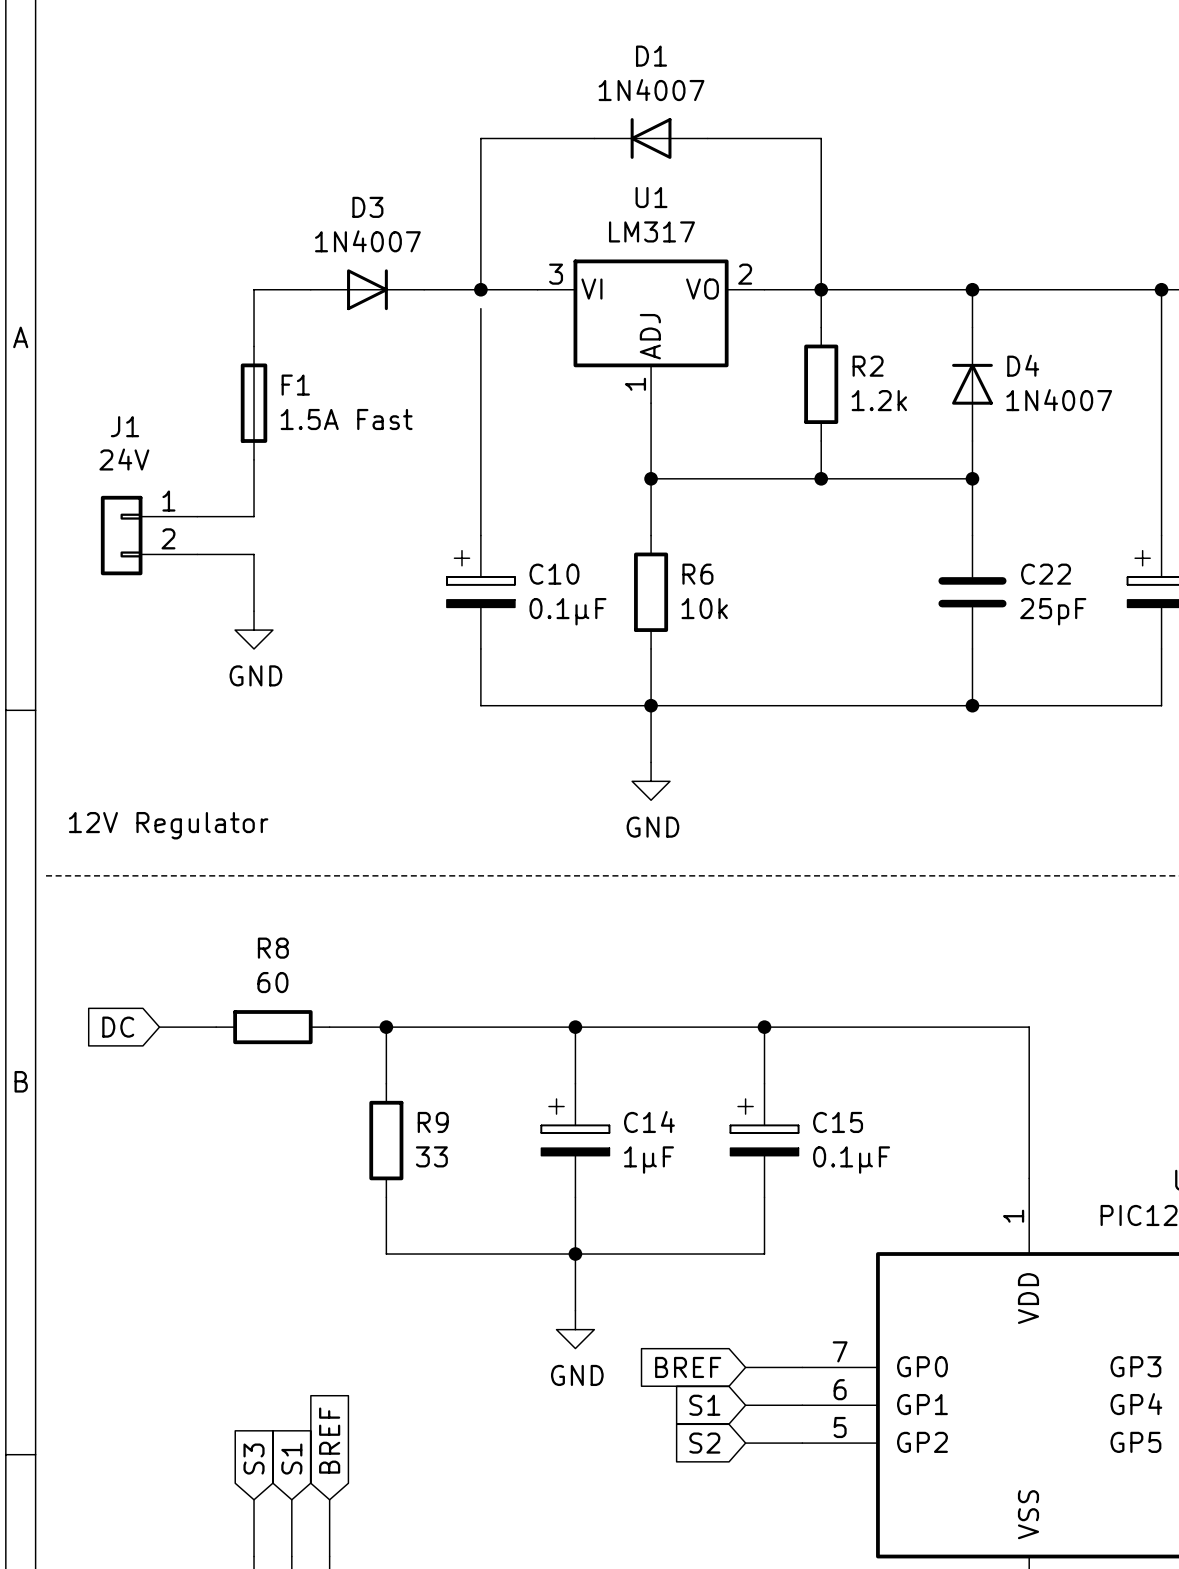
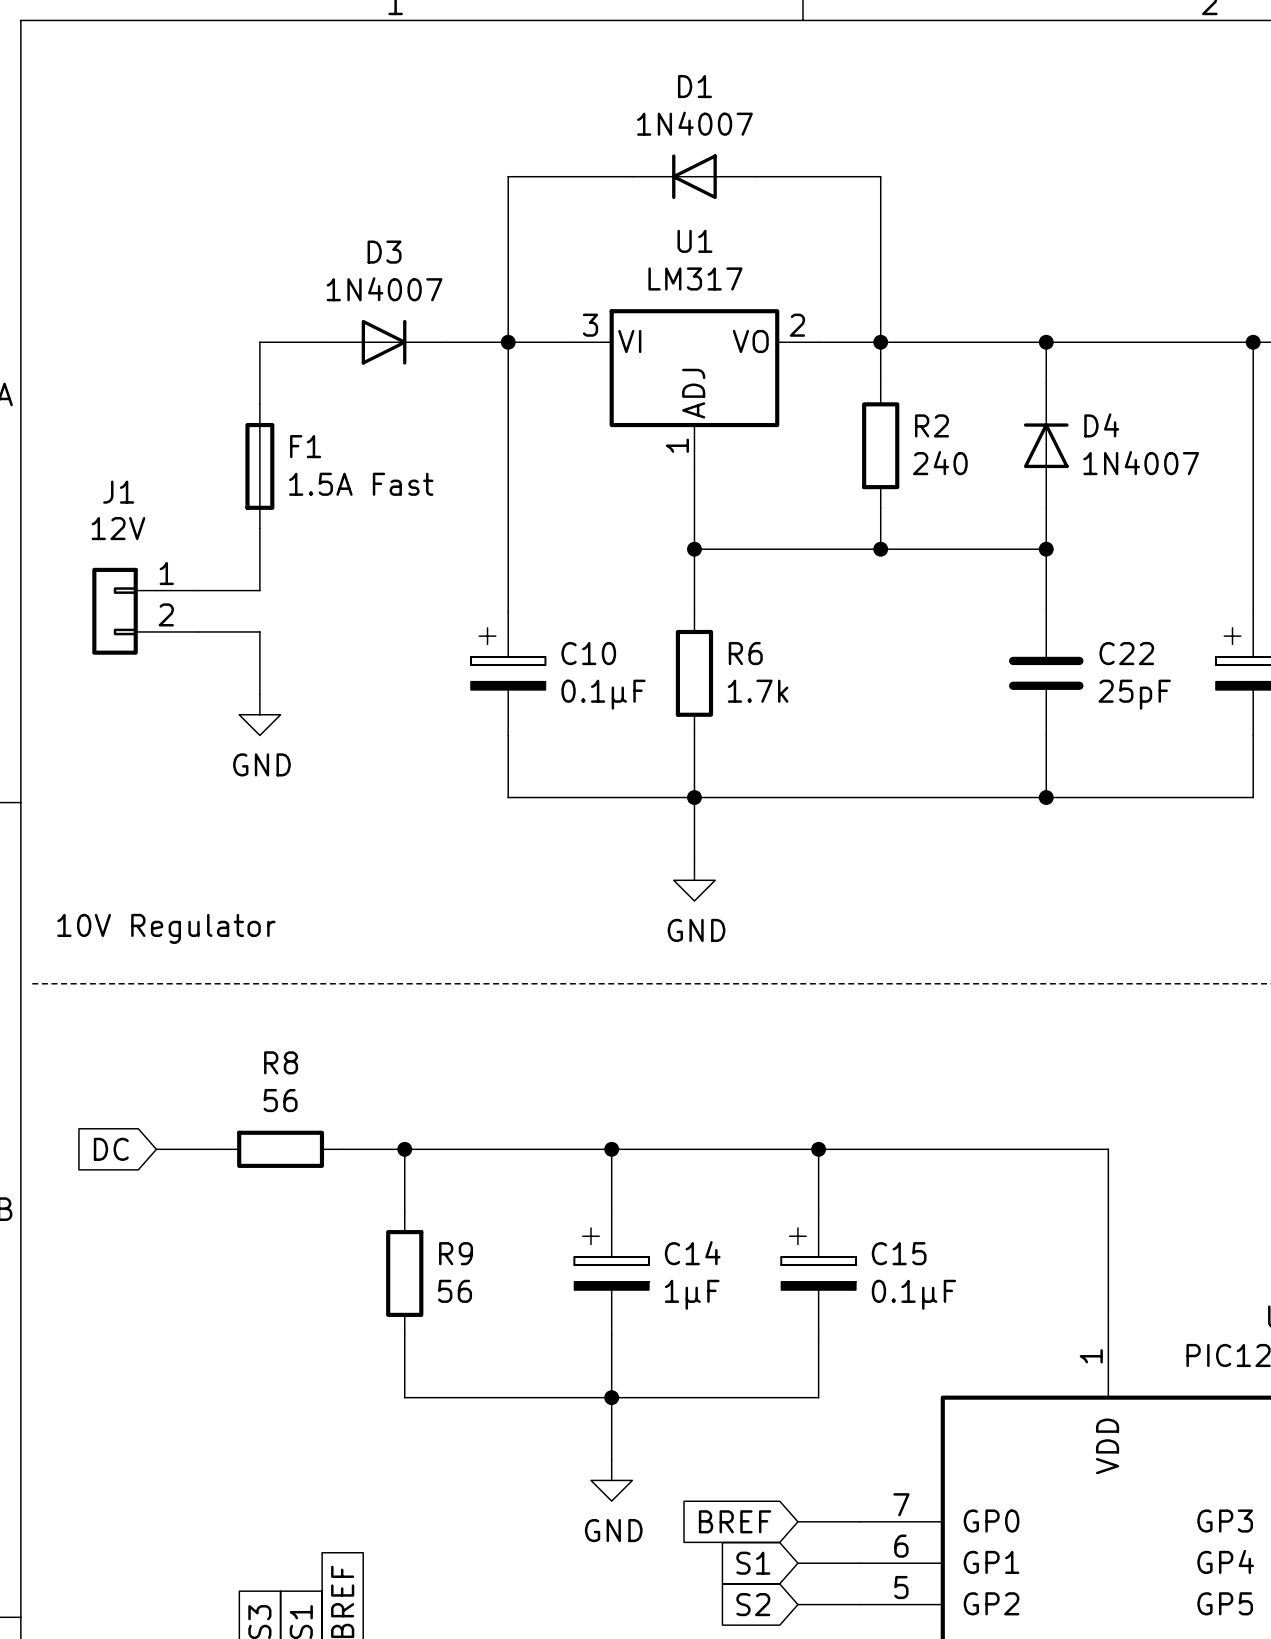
wire: none -> (508, 342) (508, 362)
R2 value: 1.2k (879, 400) -> 240 (940, 463)
J1 value: 24V (124, 459) -> 12V (118, 528)
R6 value: 10k (704, 608) -> 1.7k (758, 691)
text: 12V Regulator (168, 825) -> 10V Regulator (166, 928)
R8 value: 60 (272, 982) -> 56 (280, 1100)
R9 value: 33 (431, 1156) -> 56 (455, 1291)

